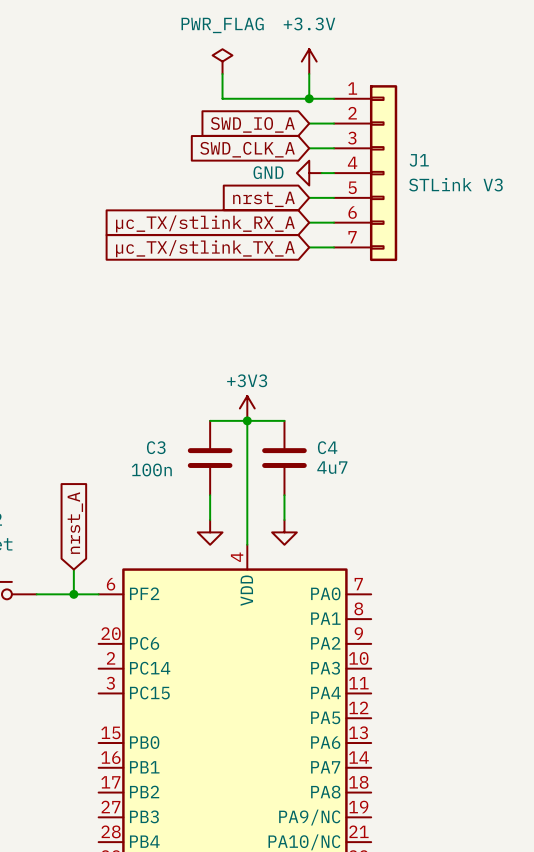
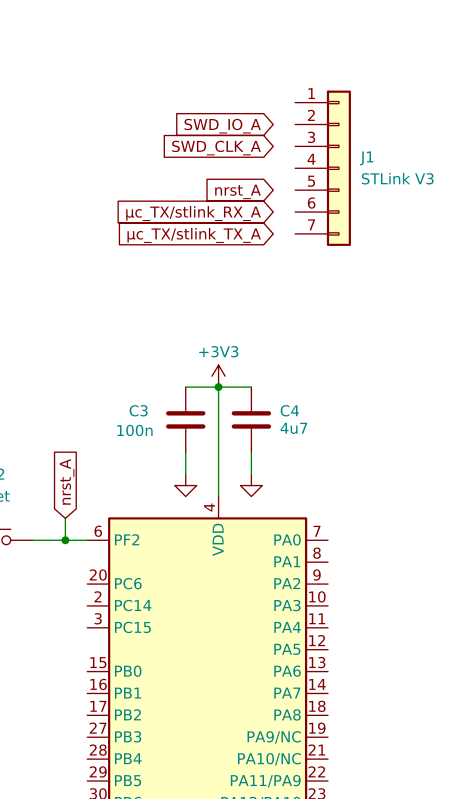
power symbol: PWR_FLAG (222, 61) -> none
power symbol: +3.3V (309, 61) -> none
wire: (222, 73) (222, 98) (334, 98) -> none
wire: (309, 73) (309, 98) -> none
junction: (309, 98) -> none
wire: (309, 123) (334, 123) -> none
wire: (309, 148) (334, 148) -> none
power symbol: GND (309, 173) -> none
wire: (321, 173) (334, 173) -> none
wire: (309, 197) (334, 197) -> none
wire: (309, 222) (334, 222) -> none
wire: (309, 247) (334, 247) -> none

